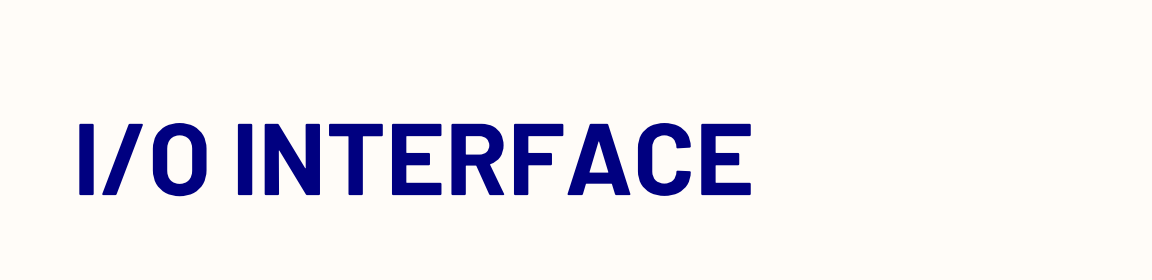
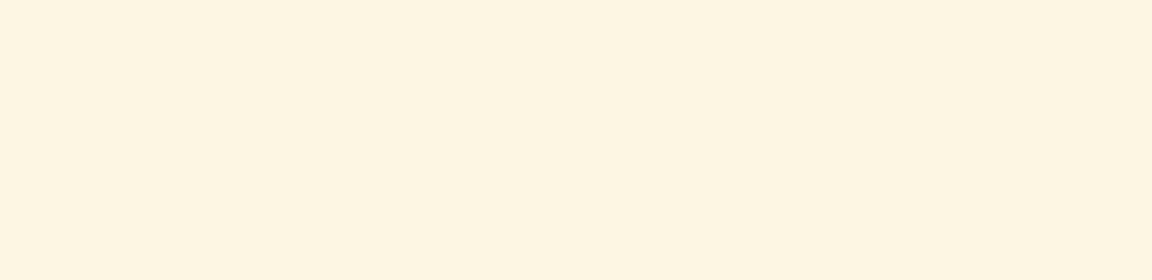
text: I/O INTERFACE (415, 159) -> none

